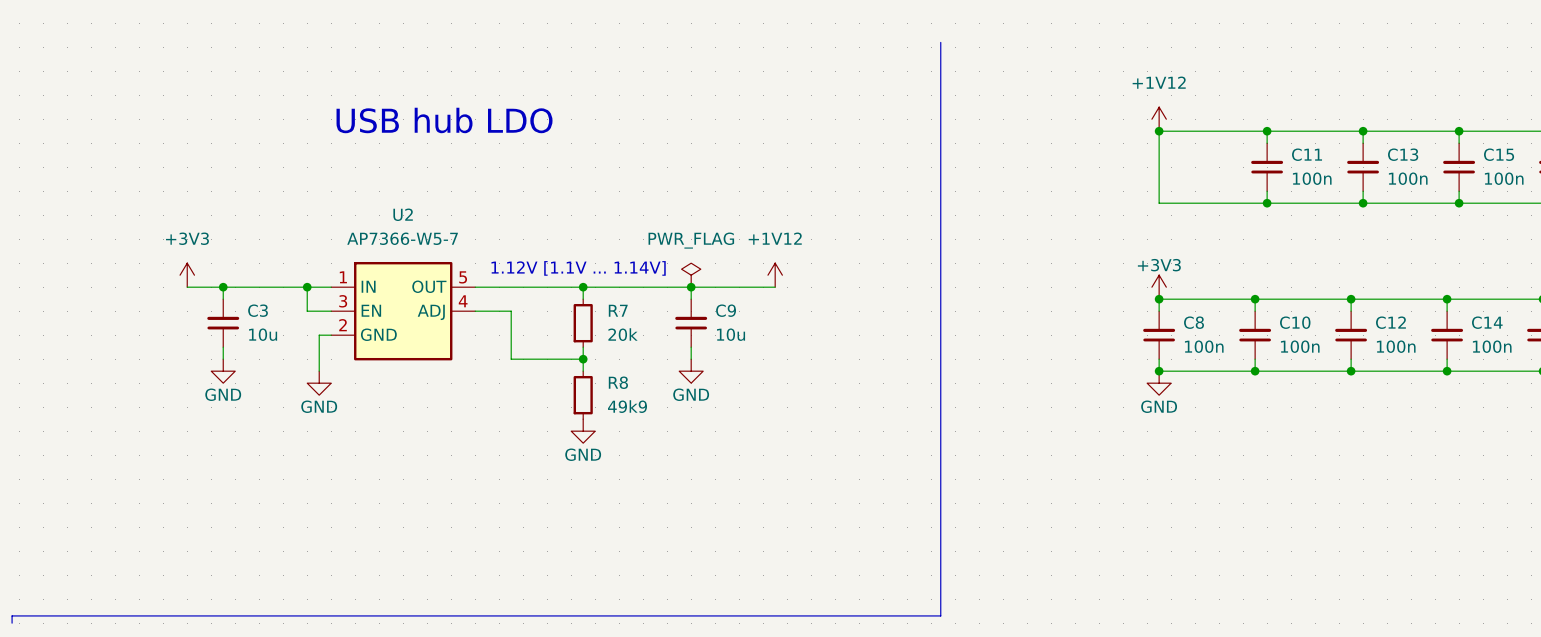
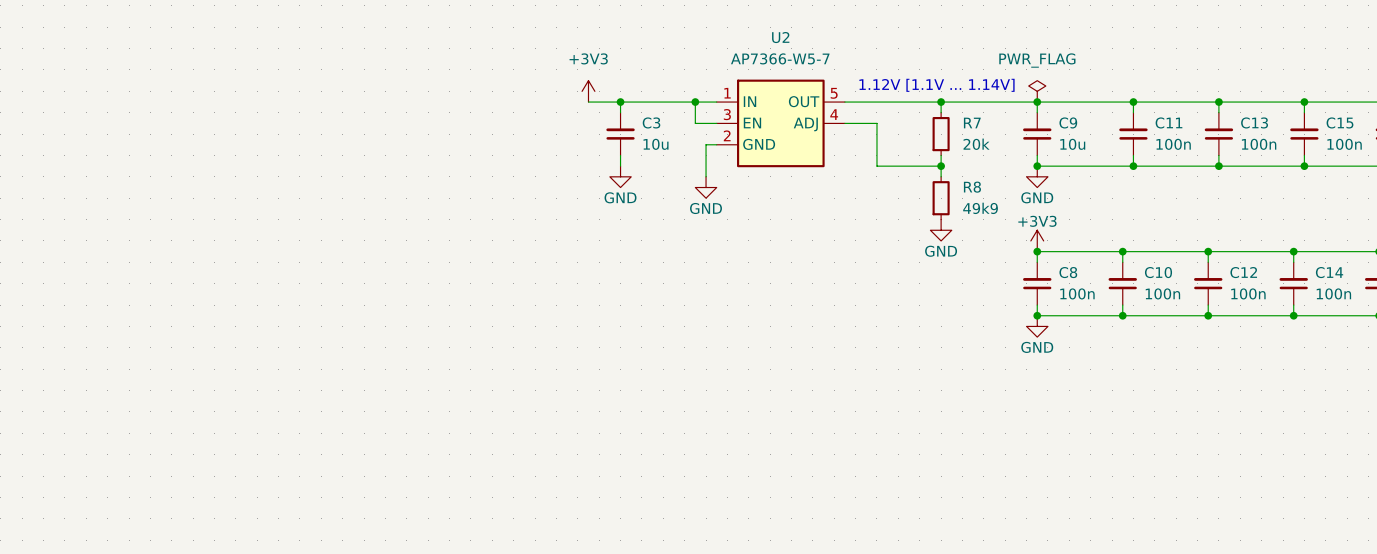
line: (940, 42) (940, 615) (12, 615) (12, 623) -> none
text: none -> 1.12V [1.1V ... 1.14V] (937, 85)
power symbol: none -> +3V3 (588, 91)
power symbol: +1V12 (1159, 119) -> PWR_FLAG (1037, 91)
text: USB hub LDO (444, 120) -> none
wire: none -> (588, 102) (716, 102)
junction: none -> (620, 102)
wire: none -> (695, 102) (695, 123) (716, 123)
junction: none -> (695, 102)
wire: none -> (844, 102) (1037, 102)
wire: none -> (941, 102) (941, 112)
junction: none -> (941, 102)
wire: none -> (844, 123) (876, 123) (876, 166) (941, 166)
wire: none -> (716, 144) (706, 144) (706, 176)
wire: none -> (941, 155) (941, 176)
junction: none -> (941, 166)
junction: none -> (1037, 166)
power symbol: none -> GND (620, 176)
power symbol: none -> GND (1037, 176)
power symbol: none -> GND (706, 187)
text: 1.12V [1.1V ... 1.14V] (578, 268) -> none
power symbol: +3V3 (187, 275) -> none
power symbol: PWR_FLAG (691, 275) -> none
power symbol: +1V12 (775, 275) -> none
power symbol: none -> GND (941, 230)
wire: (187, 287) (331, 287) -> none
wire: (223, 287) (223, 299) -> none
junction: (223, 287) -> none
wire: (307, 287) (307, 311) (331, 311) -> none
junction: (307, 287) -> none
wire: (475, 287) (775, 287) -> none
wire: (583, 287) (583, 299) -> none
junction: (583, 287) -> none
wire: (691, 287) (691, 299) -> (620, 102) (620, 112)
junction: (691, 287) -> none
U2 position: (403, 311) -> (780, 123)
wire: (475, 311) (511, 311) (511, 359) (583, 359) -> none
C3 position: (223, 323) -> (620, 134)
R7 position: (583, 323) -> (941, 134)
C9 position: (691, 323) -> (1037, 134)
wire: (331, 335) (319, 335) (319, 371) -> none
wire: (223, 347) (223, 359) -> none
wire: (583, 347) (583, 371) -> none
wire: (691, 347) (691, 359) -> (620, 155) (620, 166)
junction: (583, 359) -> none
power symbol: GND (223, 371) -> none
power symbol: GND (691, 371) -> none
power symbol: GND (319, 383) -> none
R8 position: (583, 395) -> (941, 198)
power symbol: GND (583, 431) -> none

